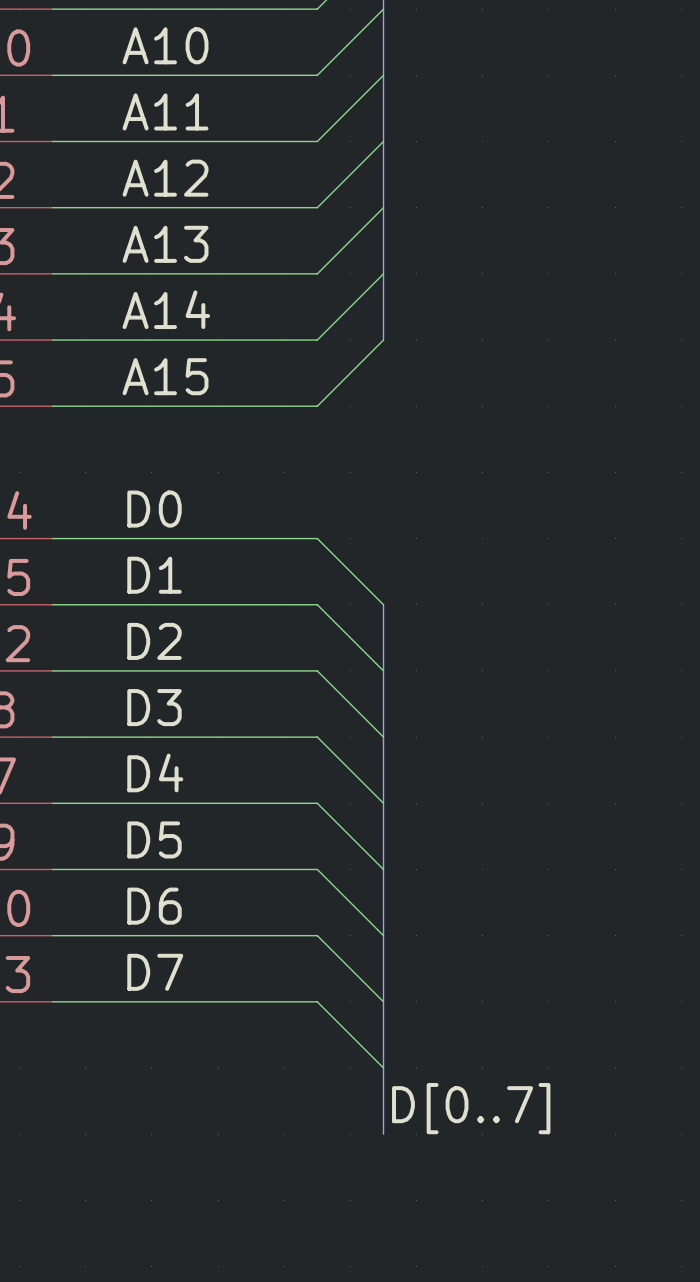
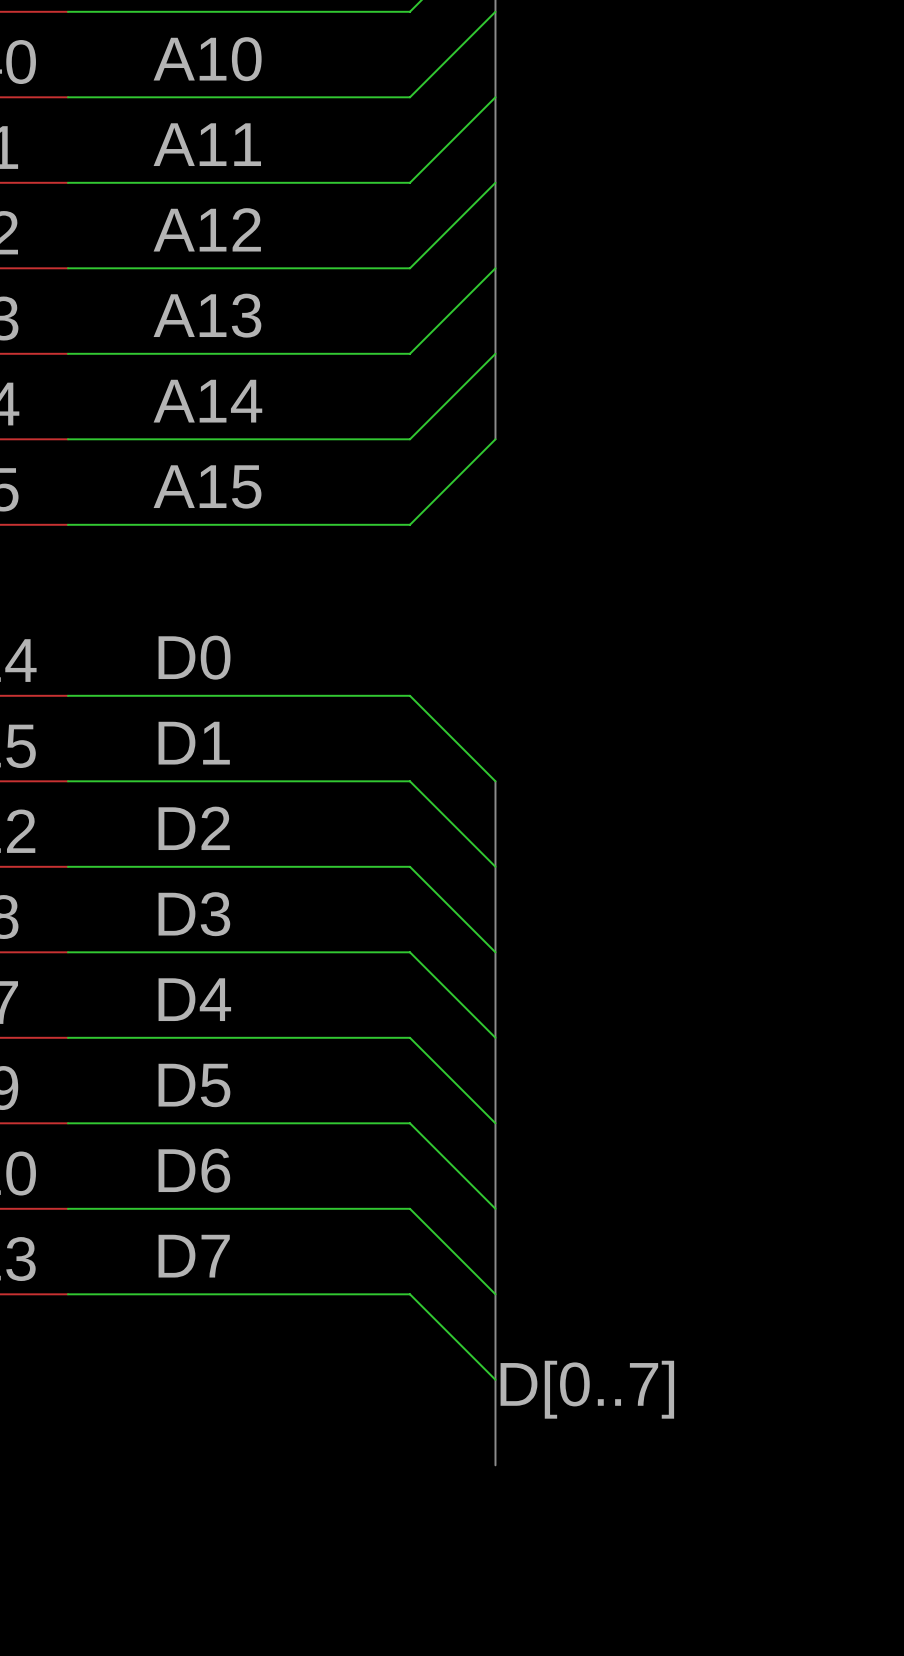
label position: D[0..7] (471, 1108) -> D[0..7] (587, 1389)

